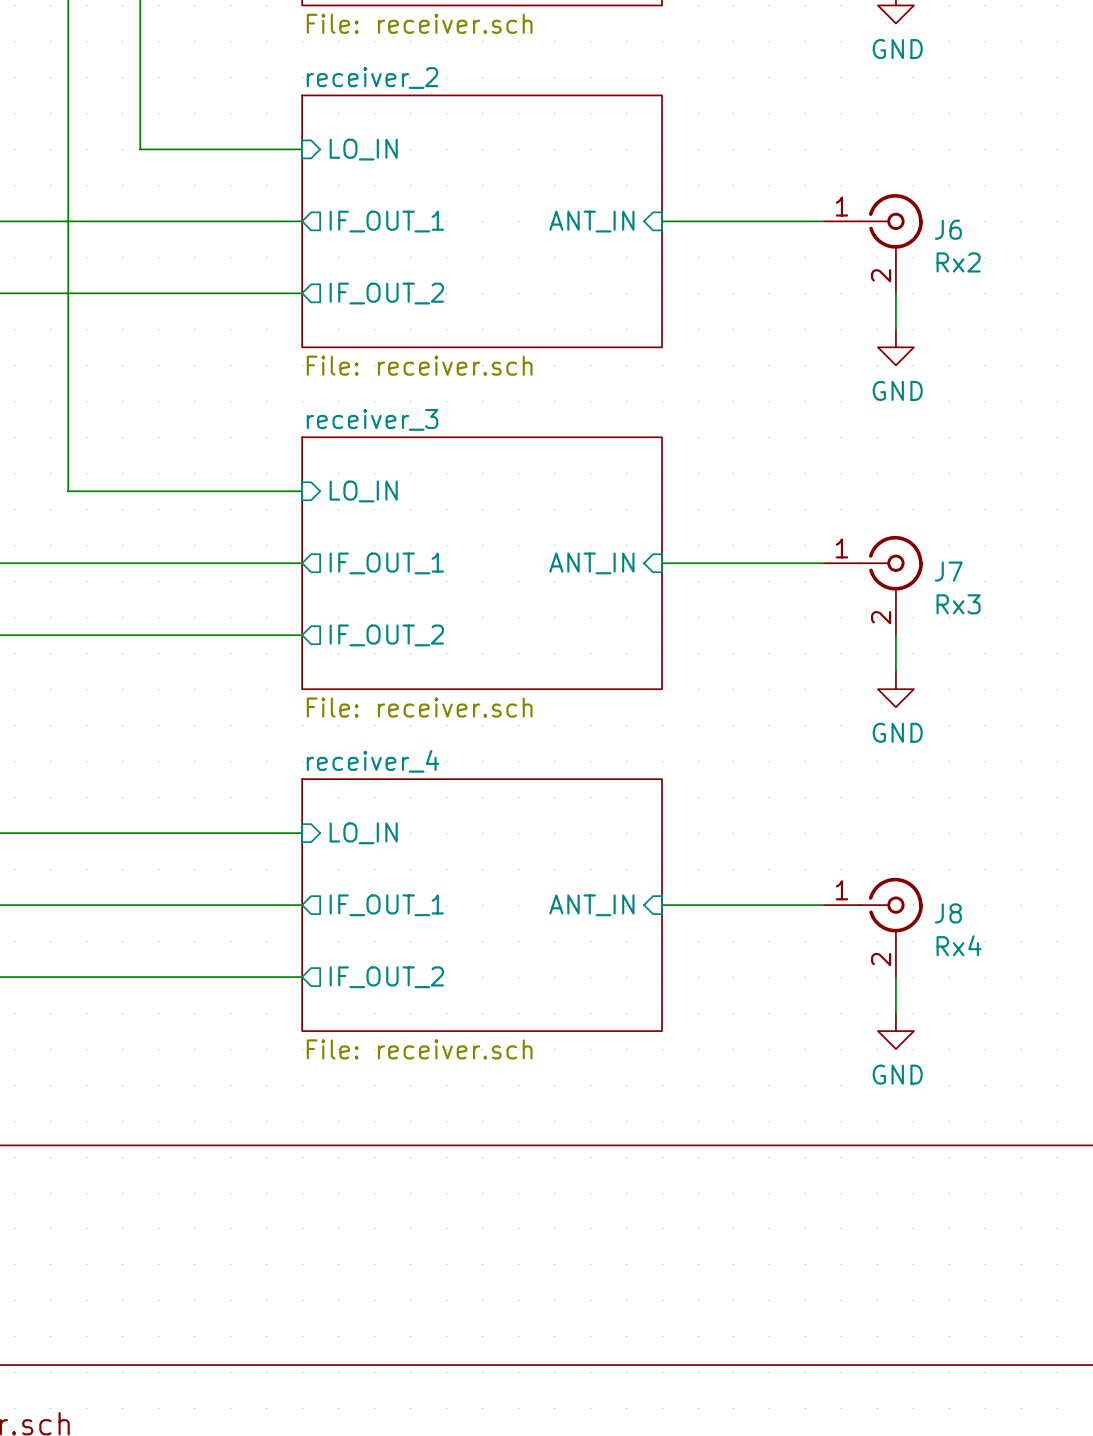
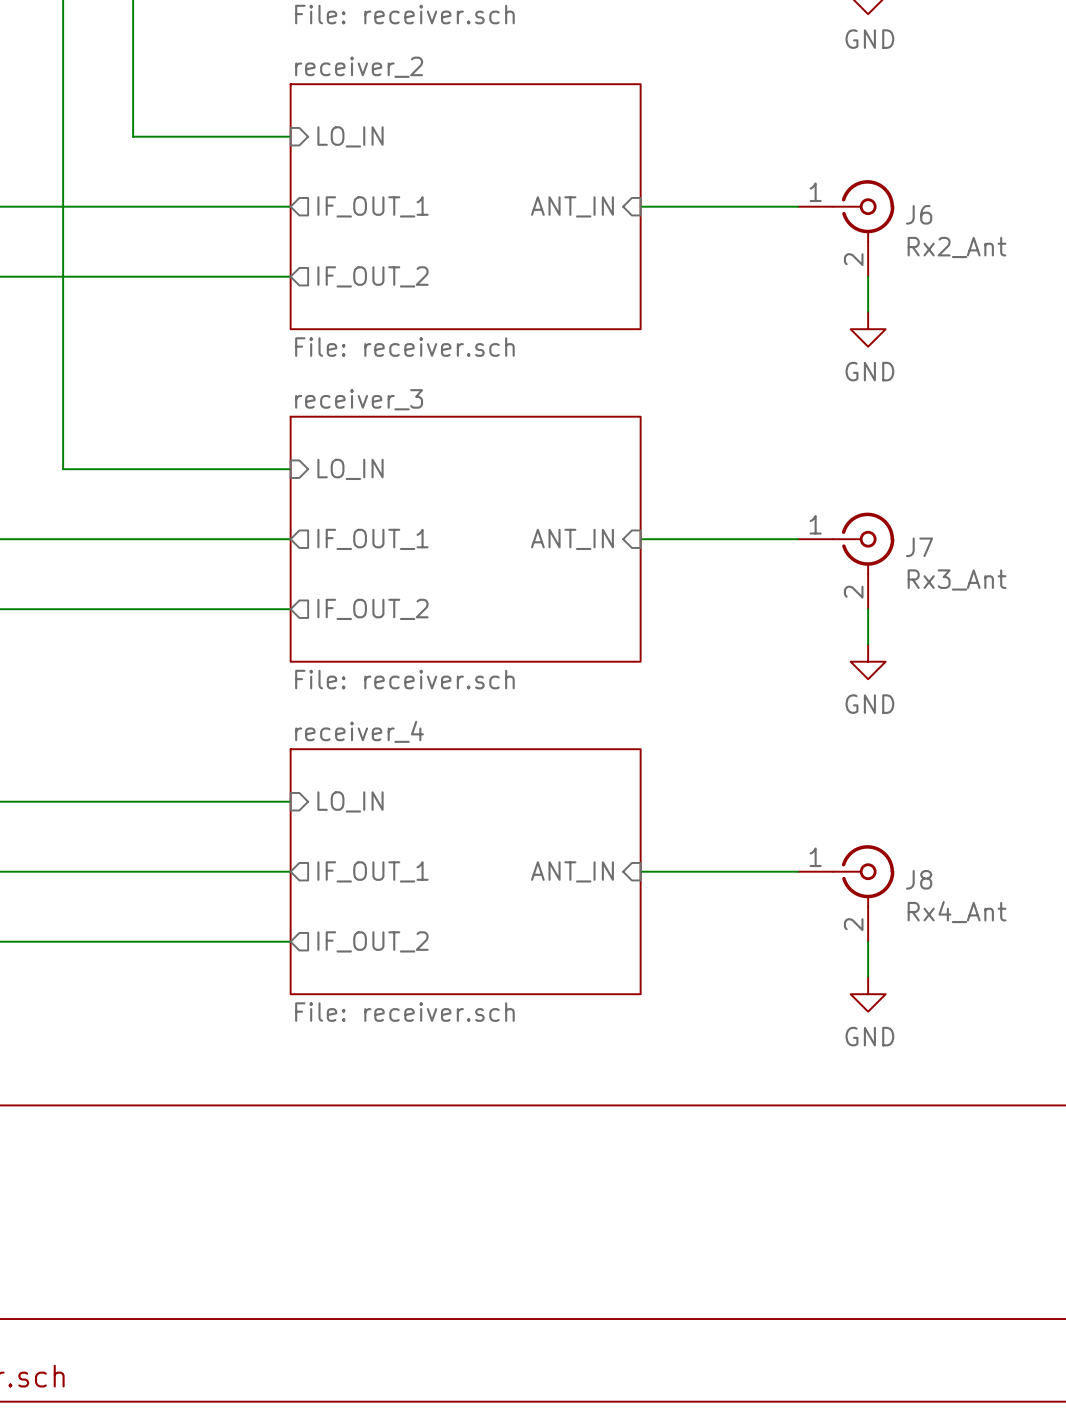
J6 value: Rx2 (958, 262) -> Rx2_Ant (957, 247)
J7 value: Rx3 (958, 604) -> Rx3_Ant (957, 579)
J8 value: Rx4 (959, 945) -> Rx4_Ant (957, 912)

